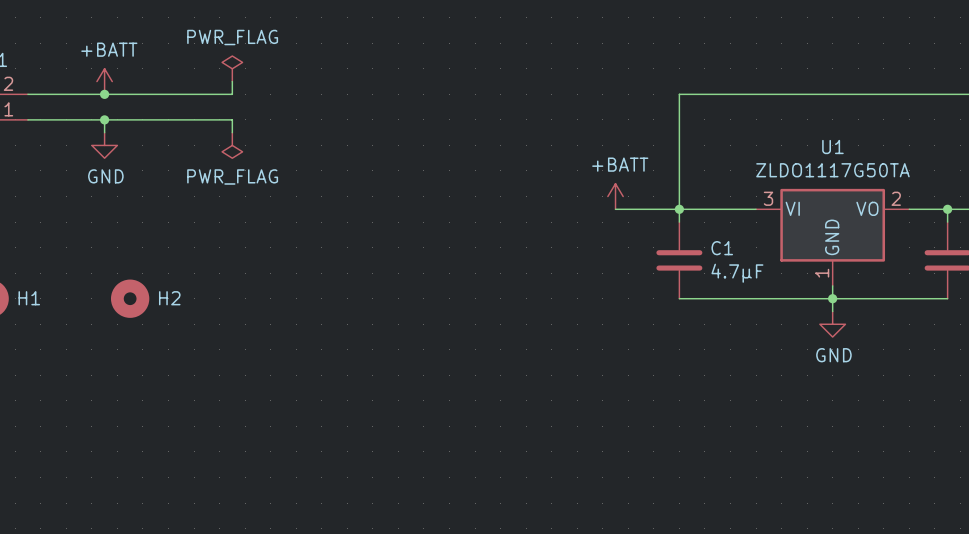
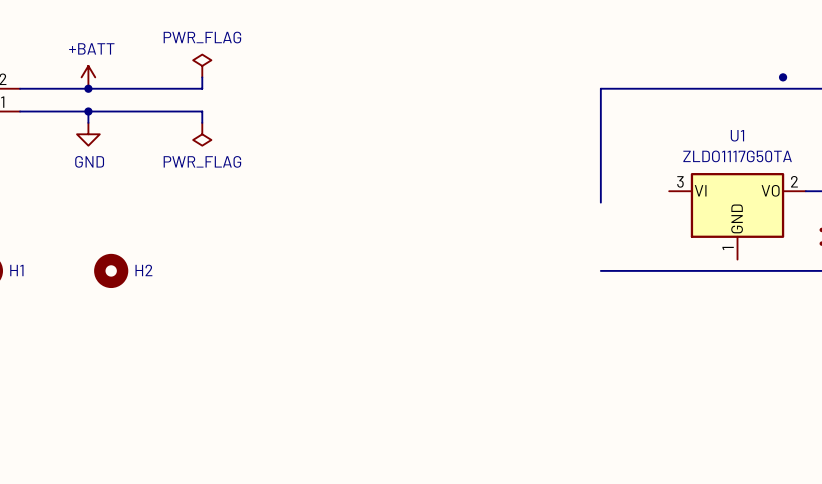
junction: none -> (783, 77)
power symbol: +BATT (615, 196) -> none
wire: (615, 209) (756, 209) -> none
junction: (679, 209) -> none
C1: 4.7µF (679, 260) -> none
wire: (832, 285) (832, 311) -> none
junction: (832, 298) -> none
power symbol: GND (832, 324) -> none

